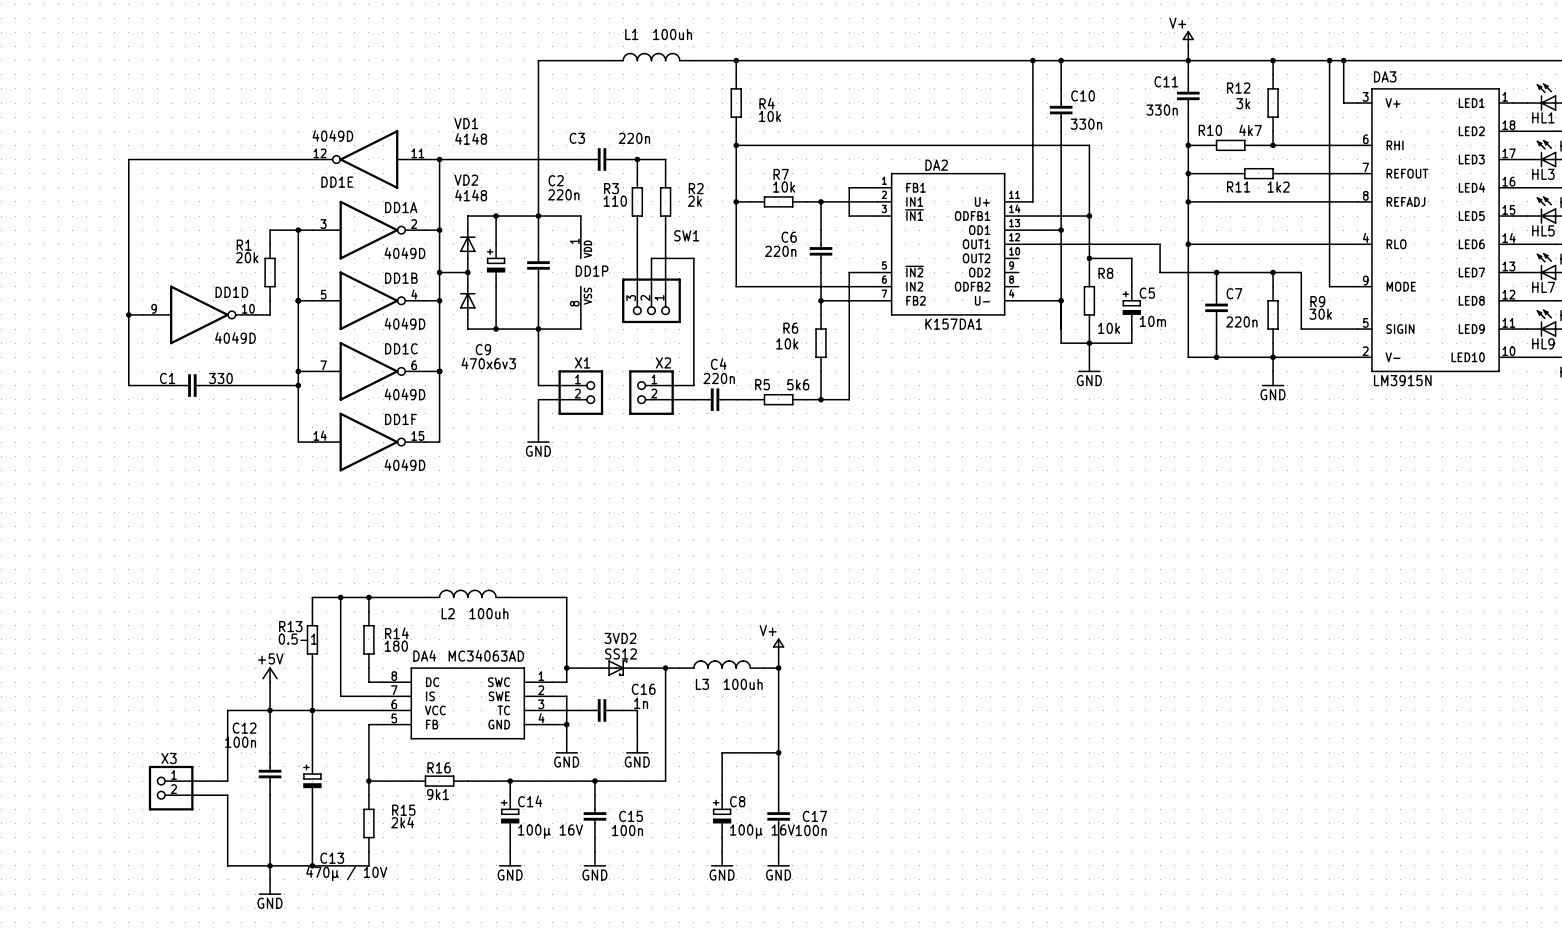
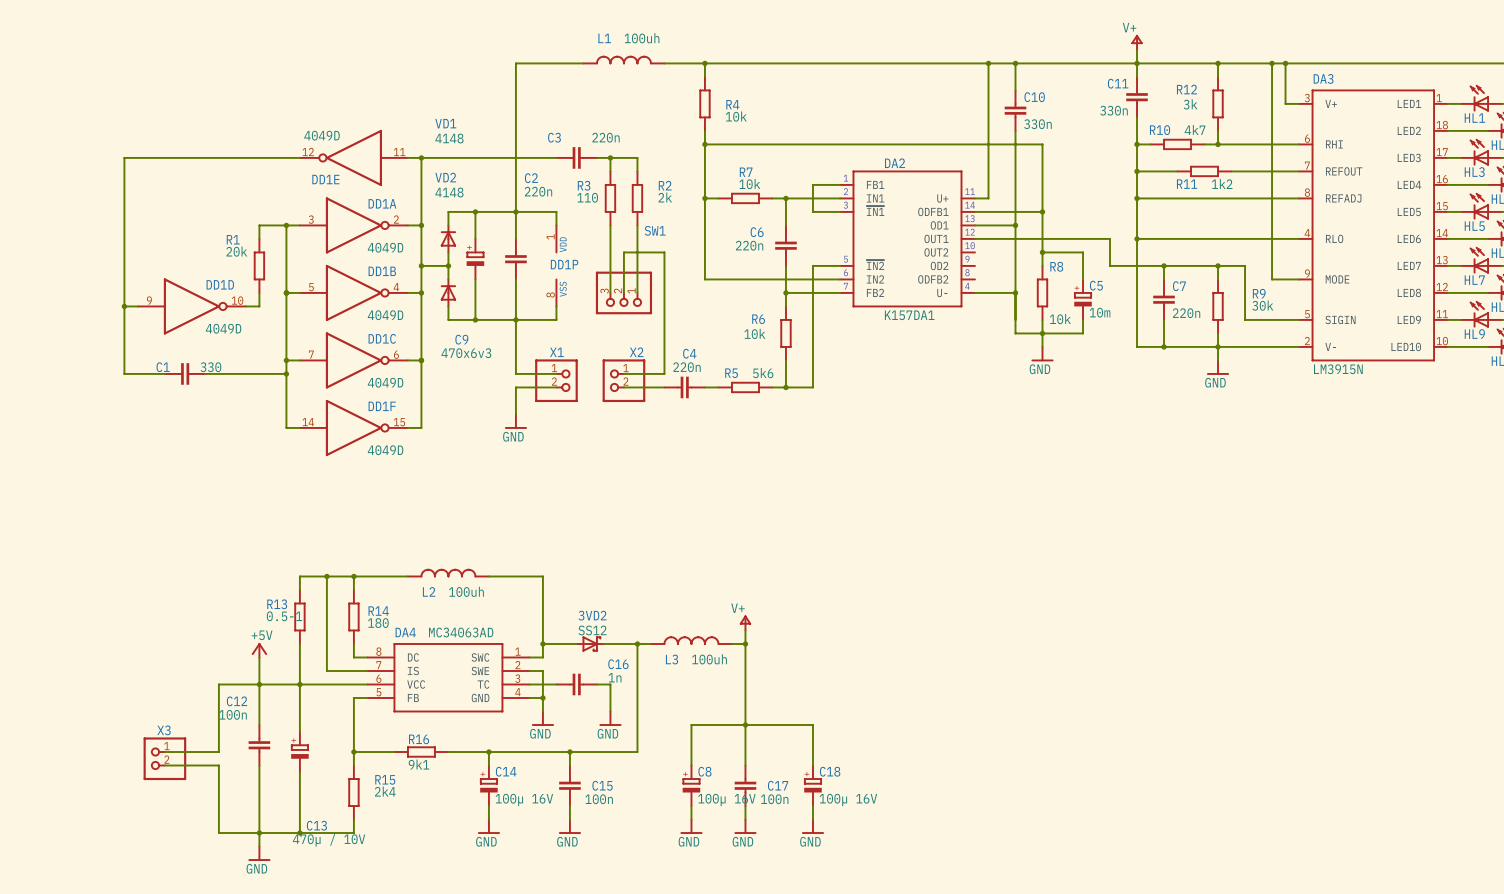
wire: none -> (745, 725) (812, 725) (812, 765)
C18: none -> 100µ 16V (812, 785)
wire: none -> (812, 806) (812, 819)
power symbol: none -> GND (812, 826)

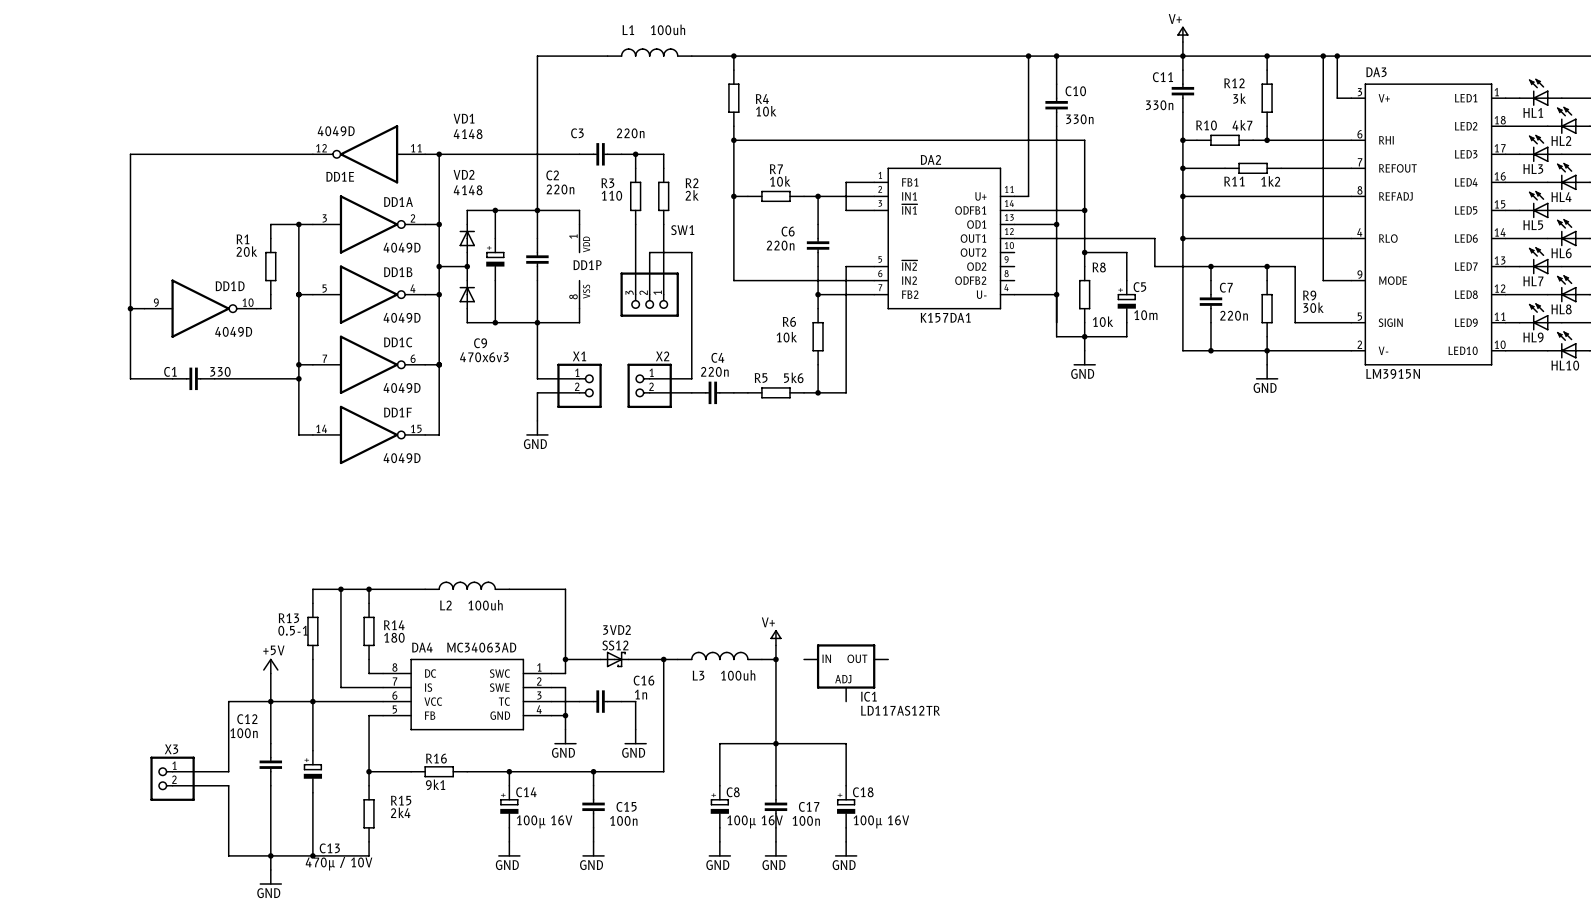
IC1: none -> LD117AS12TR (846, 672)

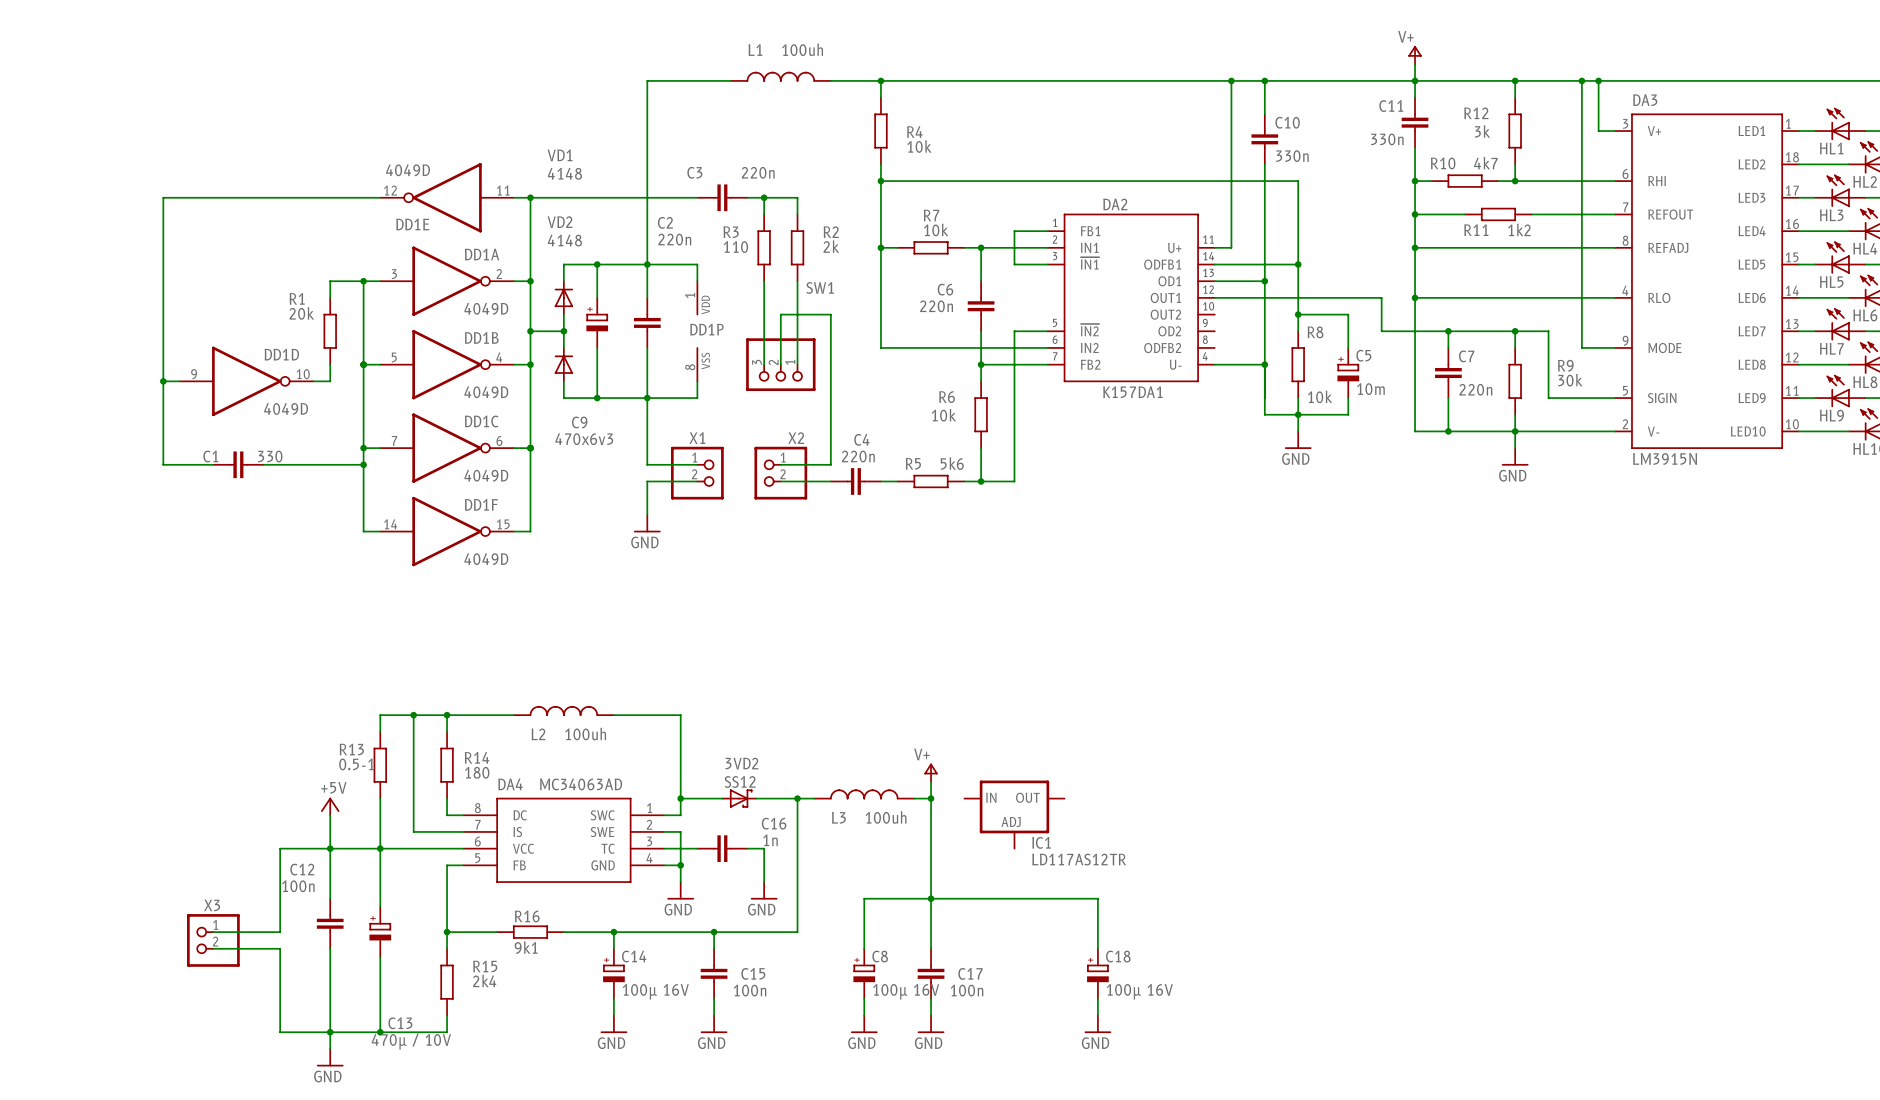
wire: (846, 743) (846, 785) -> (1014, 898) (1097, 898) (1097, 948)
C18 position: (846, 806) -> (1097, 973)
wire: (846, 827) (846, 841) -> (1097, 998) (1097, 1015)
power symbol position: GND (846, 849) -> GND (1097, 1024)

